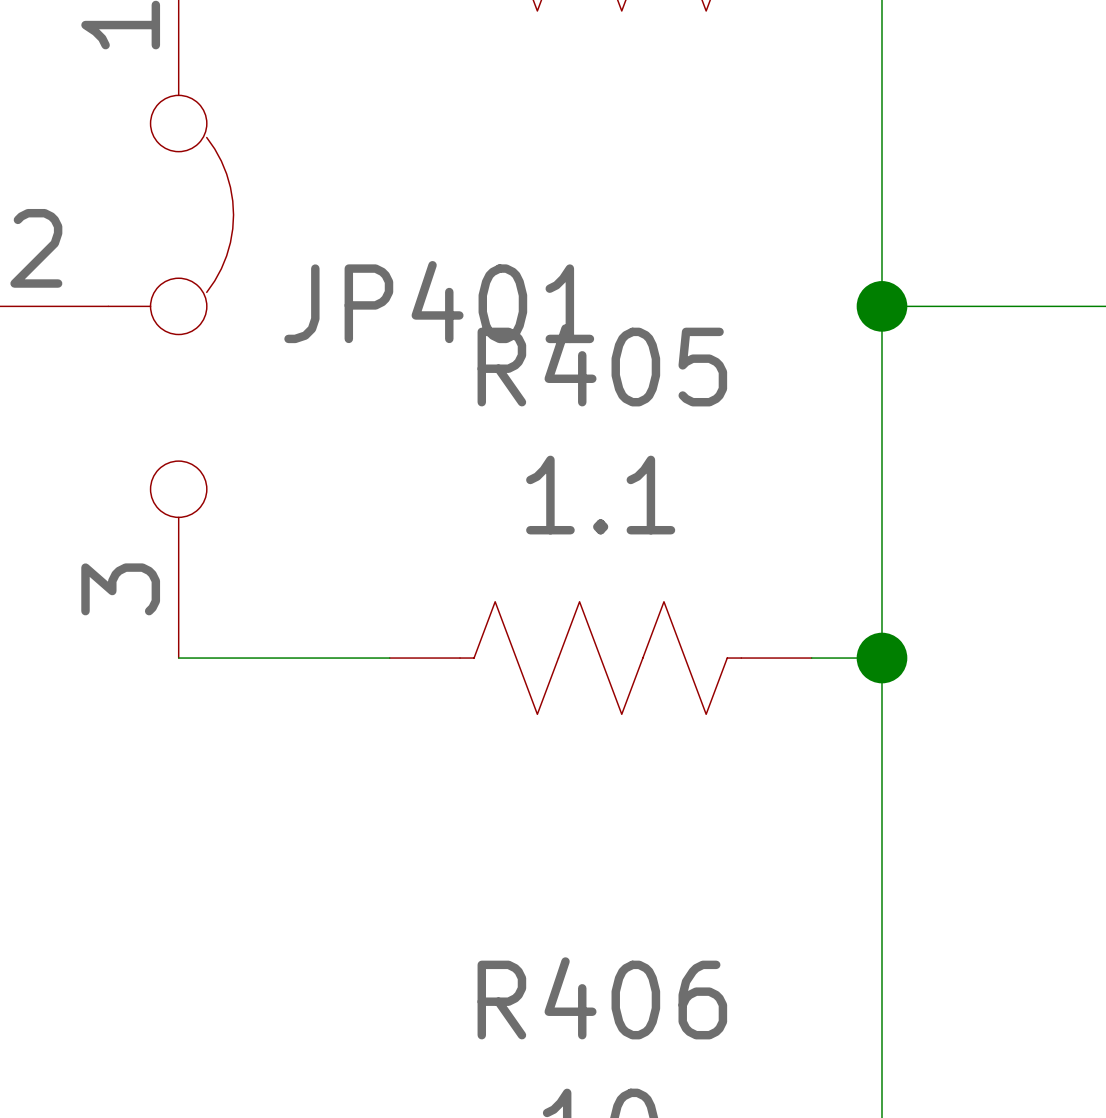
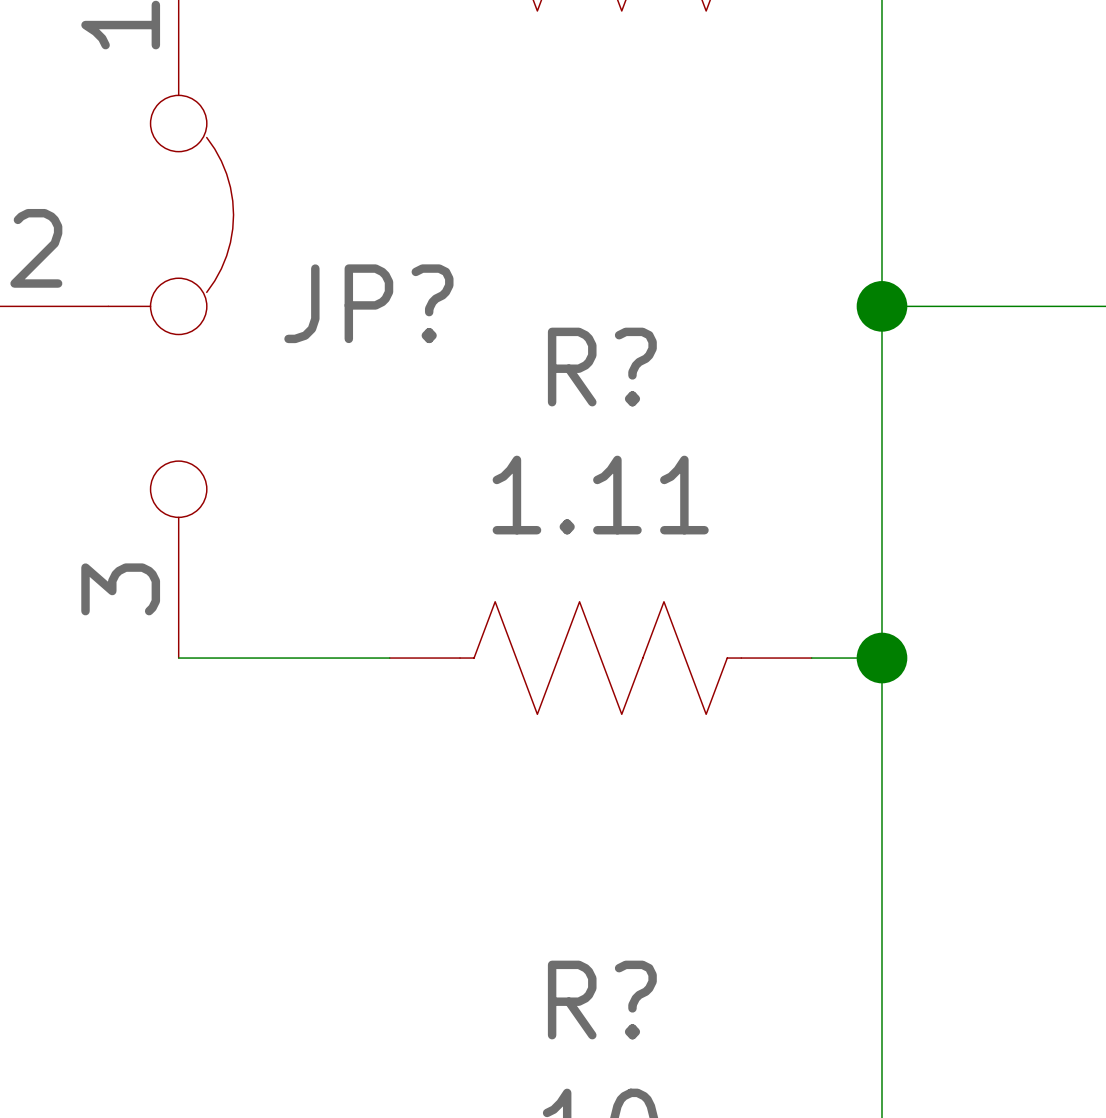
JP401 name: JP401 (439, 302) -> JP? (368, 303)
R405 name: R405 (602, 365) -> R? (602, 367)
R405 value: 1.1 (600, 495) -> 1.11 (600, 495)
R406 name: R406 (602, 998) -> R? (602, 1000)

